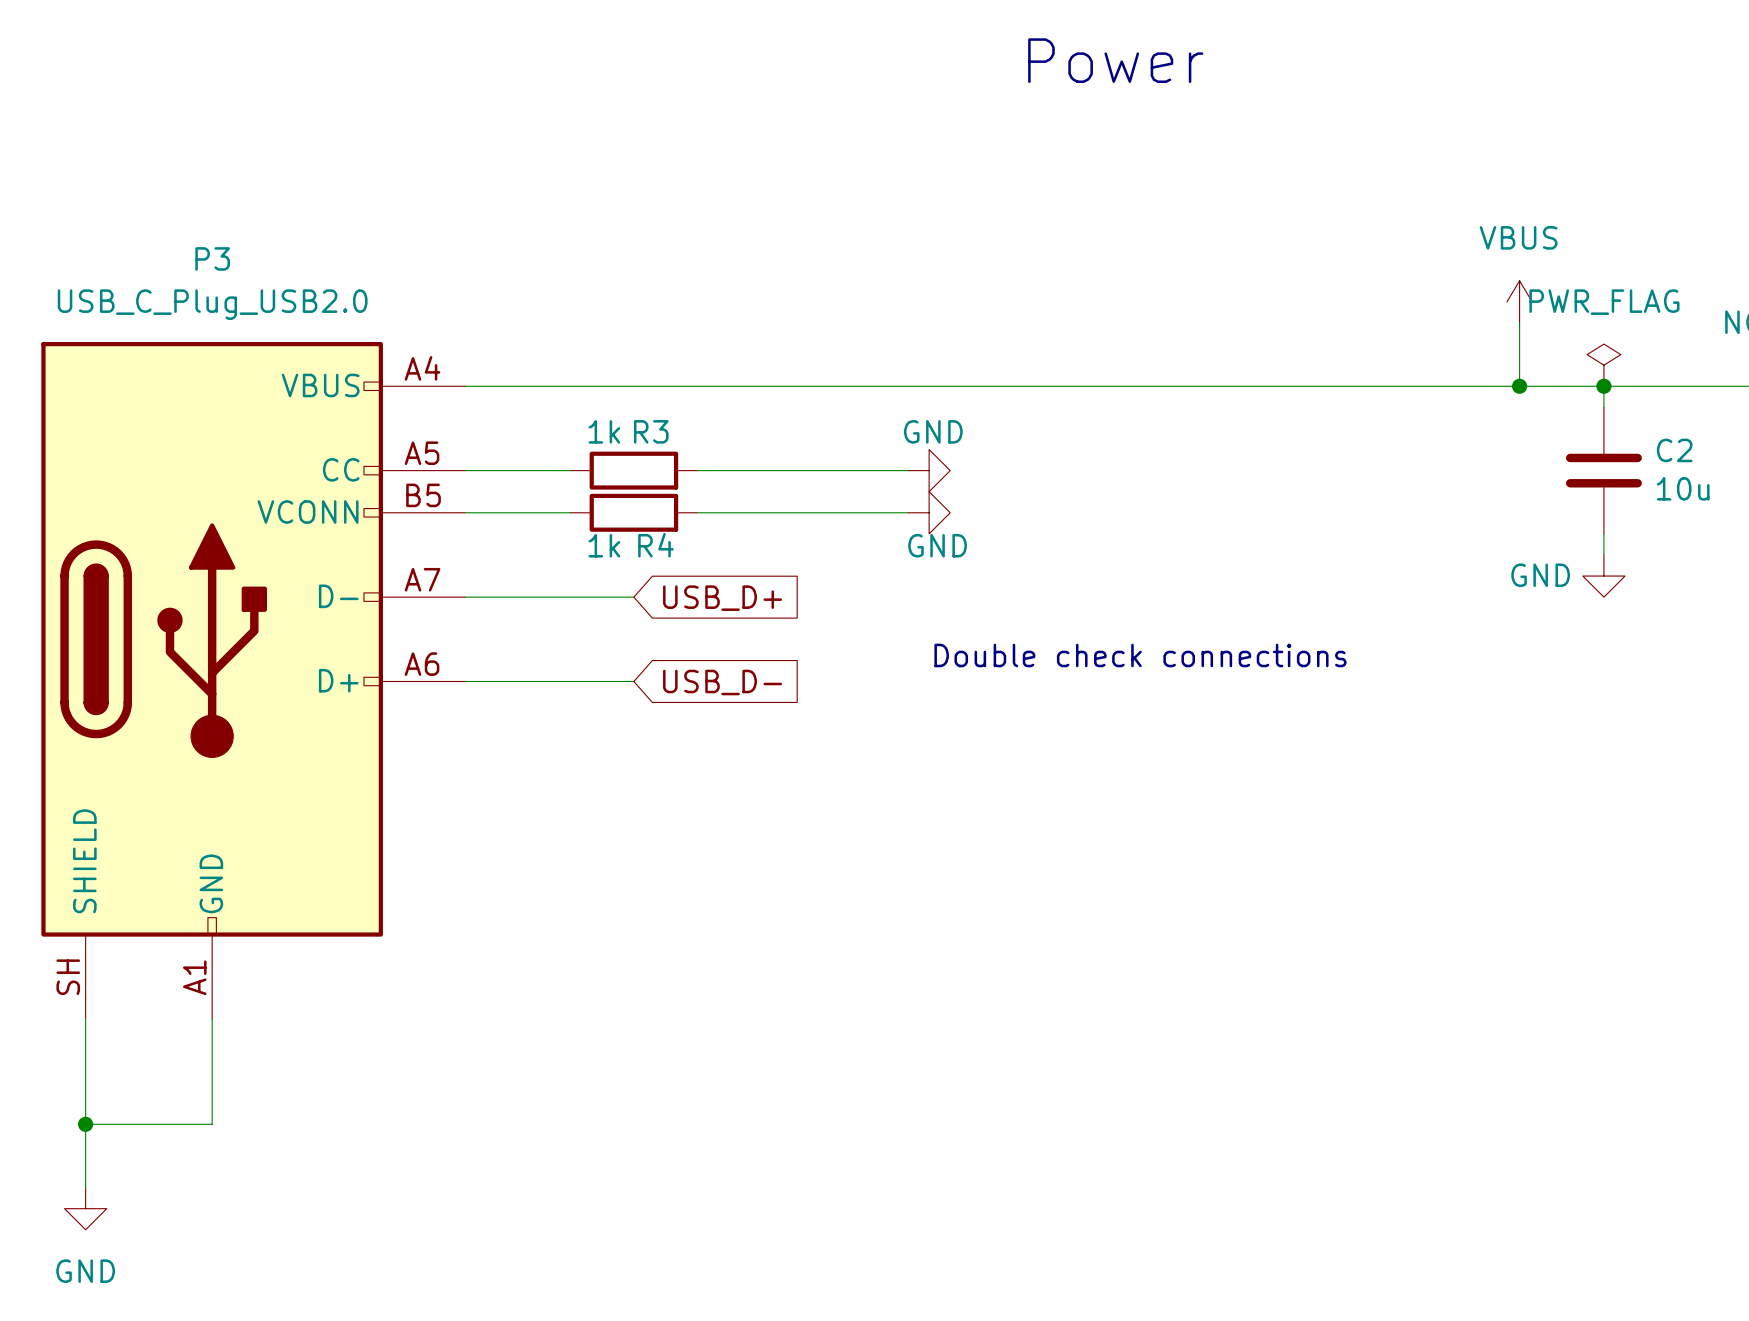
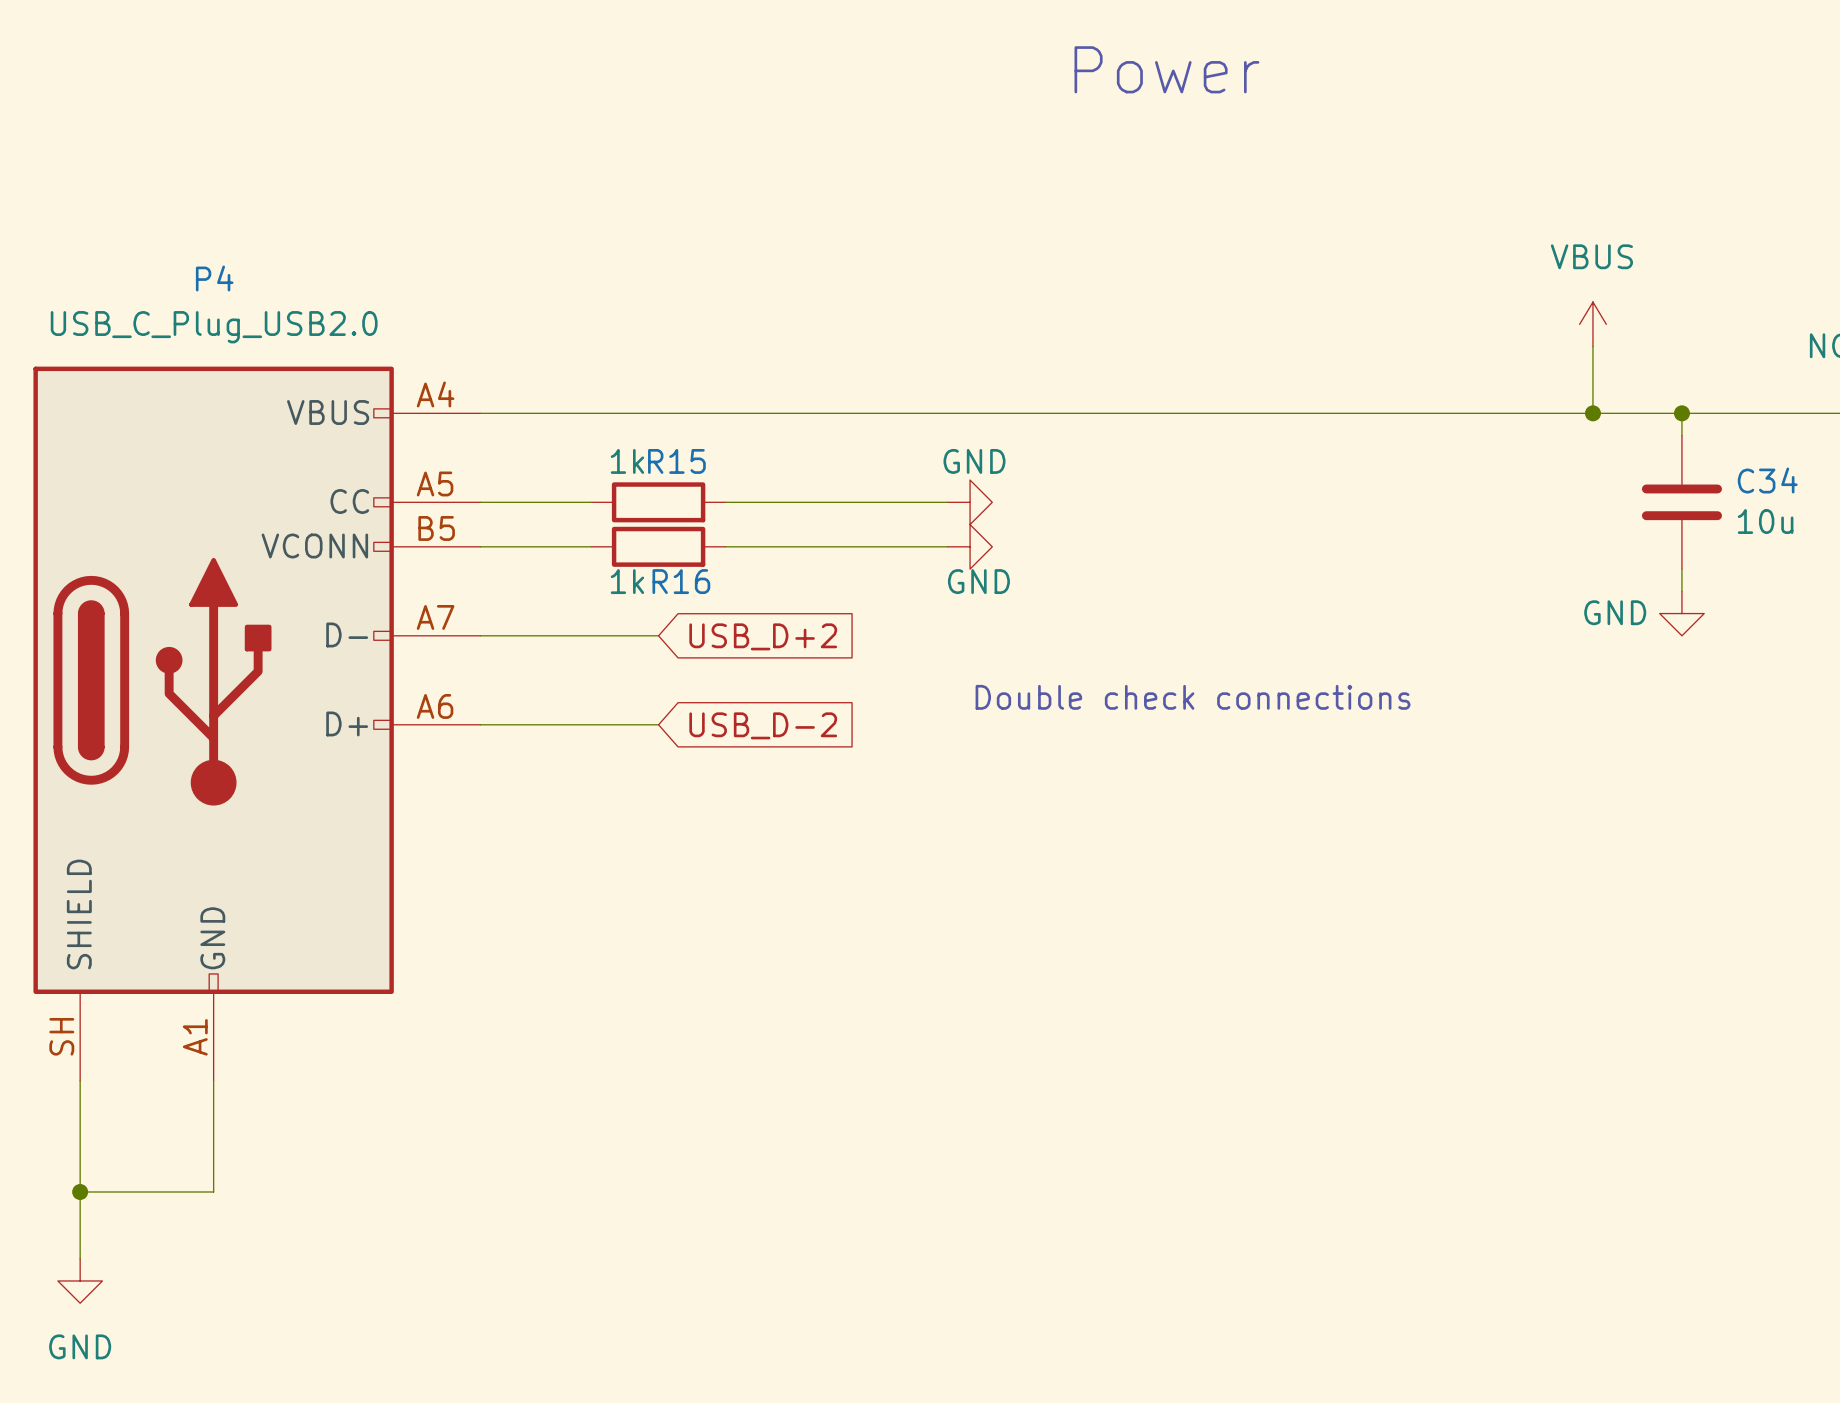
P3 name: P3 (212, 258) -> P4 (214, 278)
power symbol: PWR_FLAG (1603, 365) -> none
R3 name: R3 (651, 431) -> R15 (676, 461)
C2 name: C2 (1674, 450) -> C34 (1767, 480)
R4 name: R4 (656, 545) -> R16 (681, 581)
global label: USB_D+ (722, 598) -> USB_D+2 (763, 636)
global label: USB_D- (722, 682) -> USB_D-2 (763, 725)

